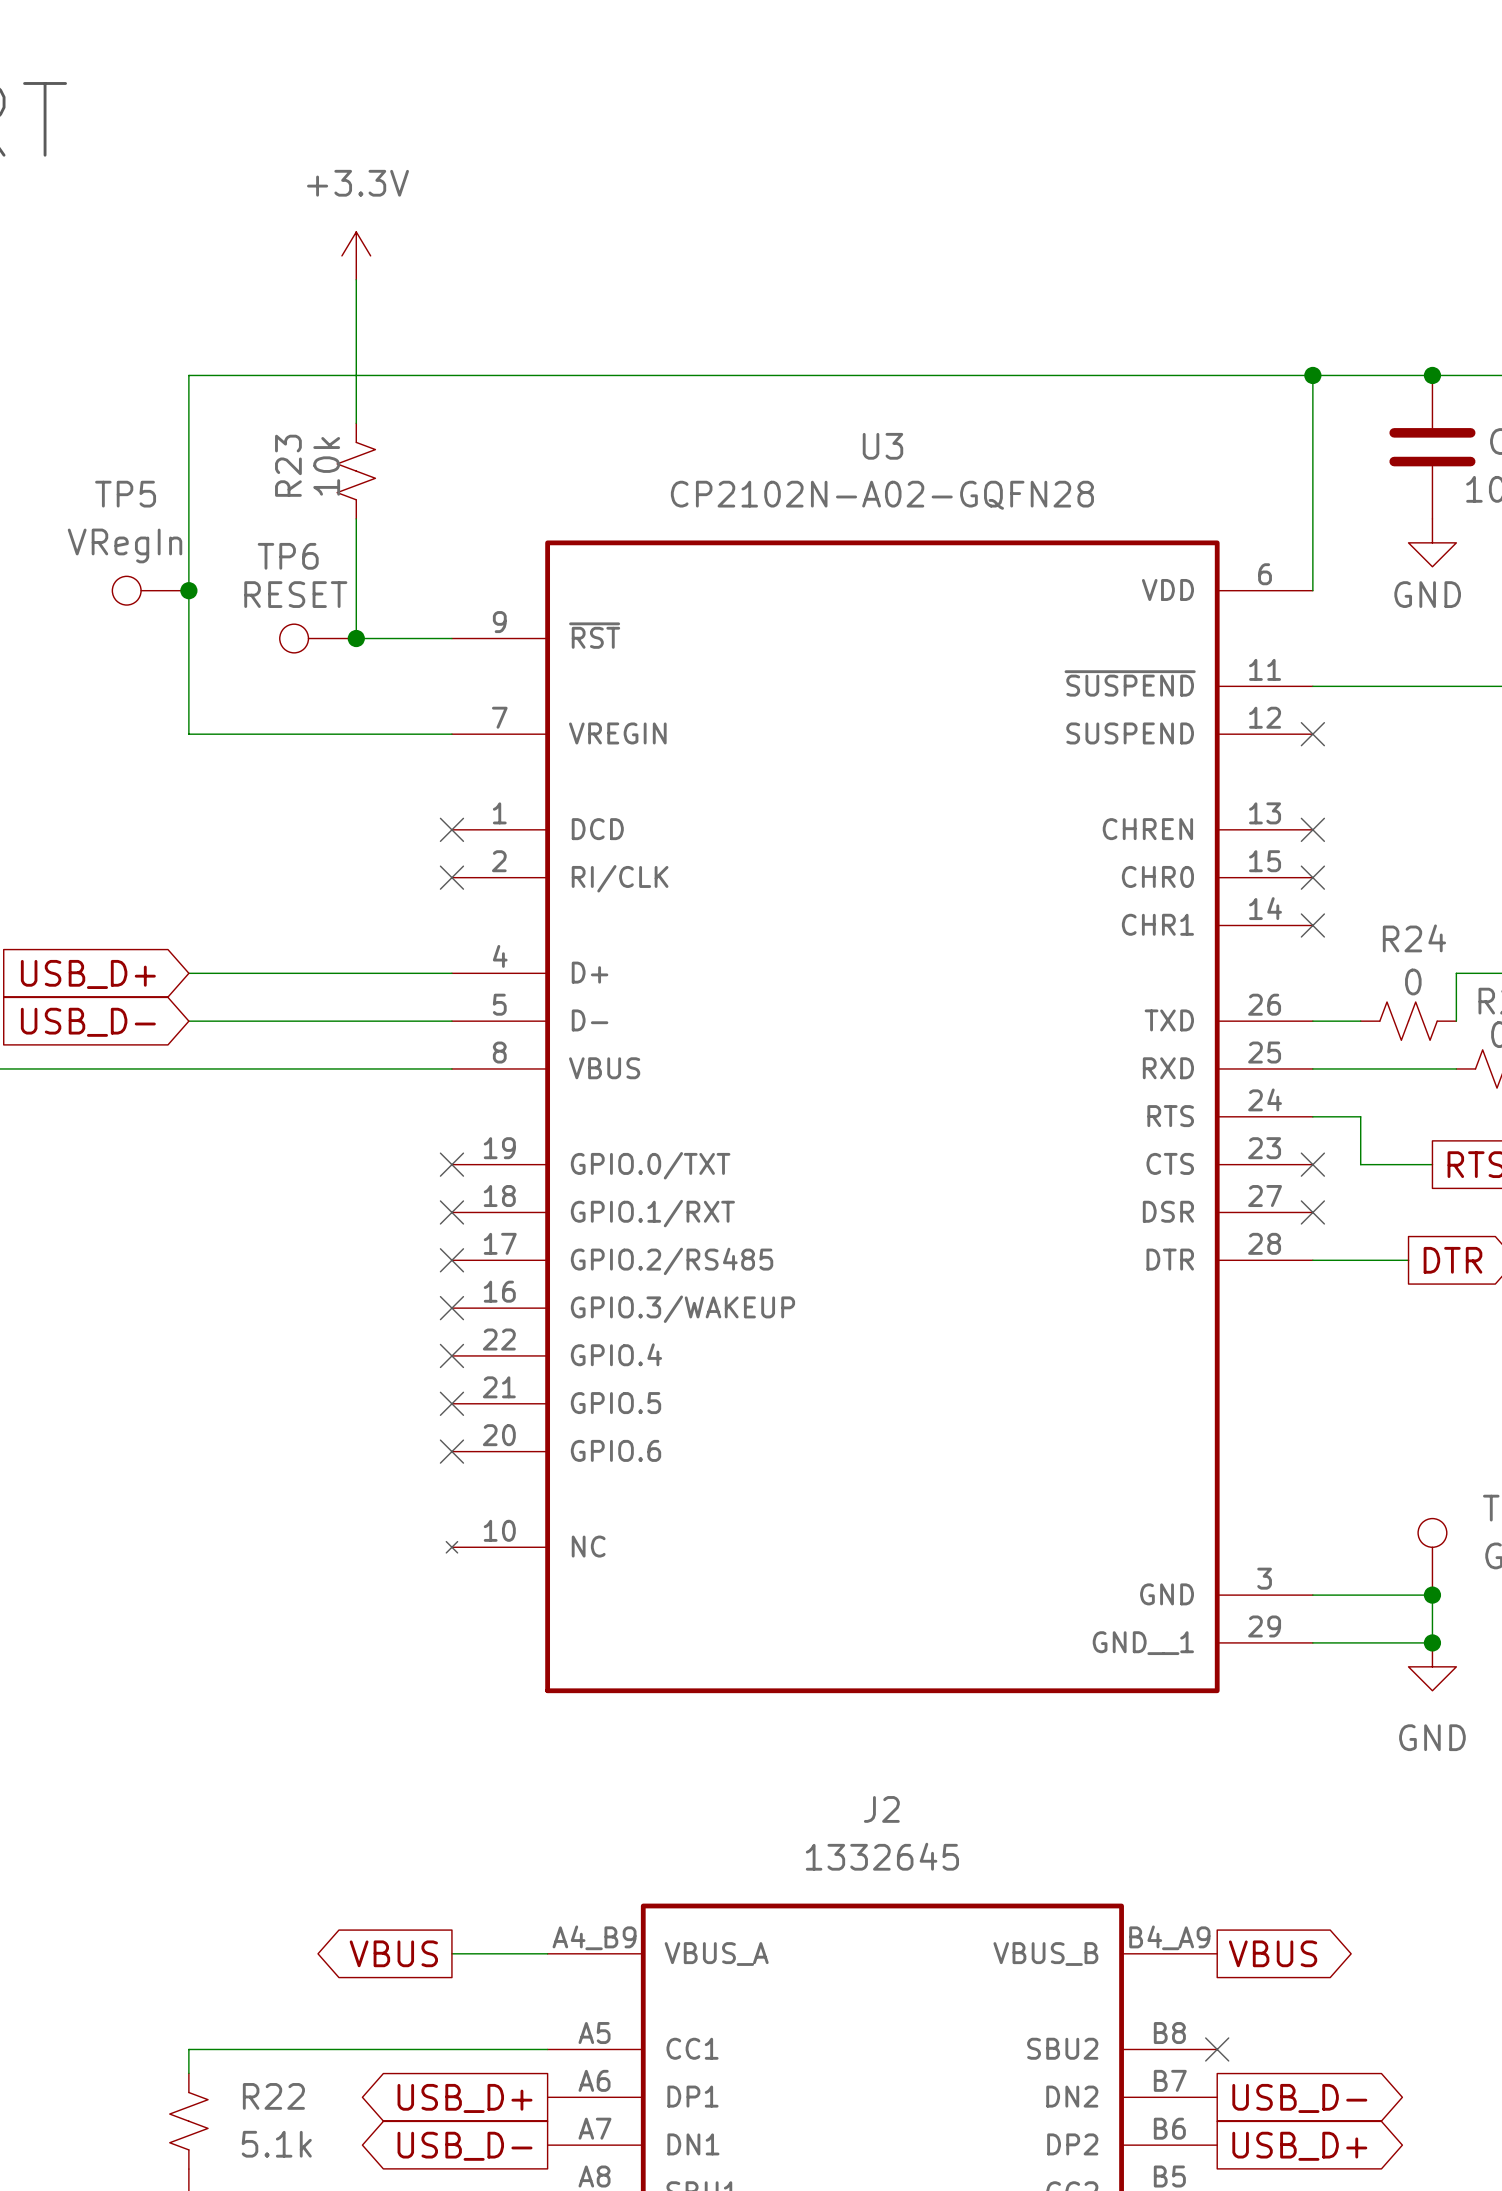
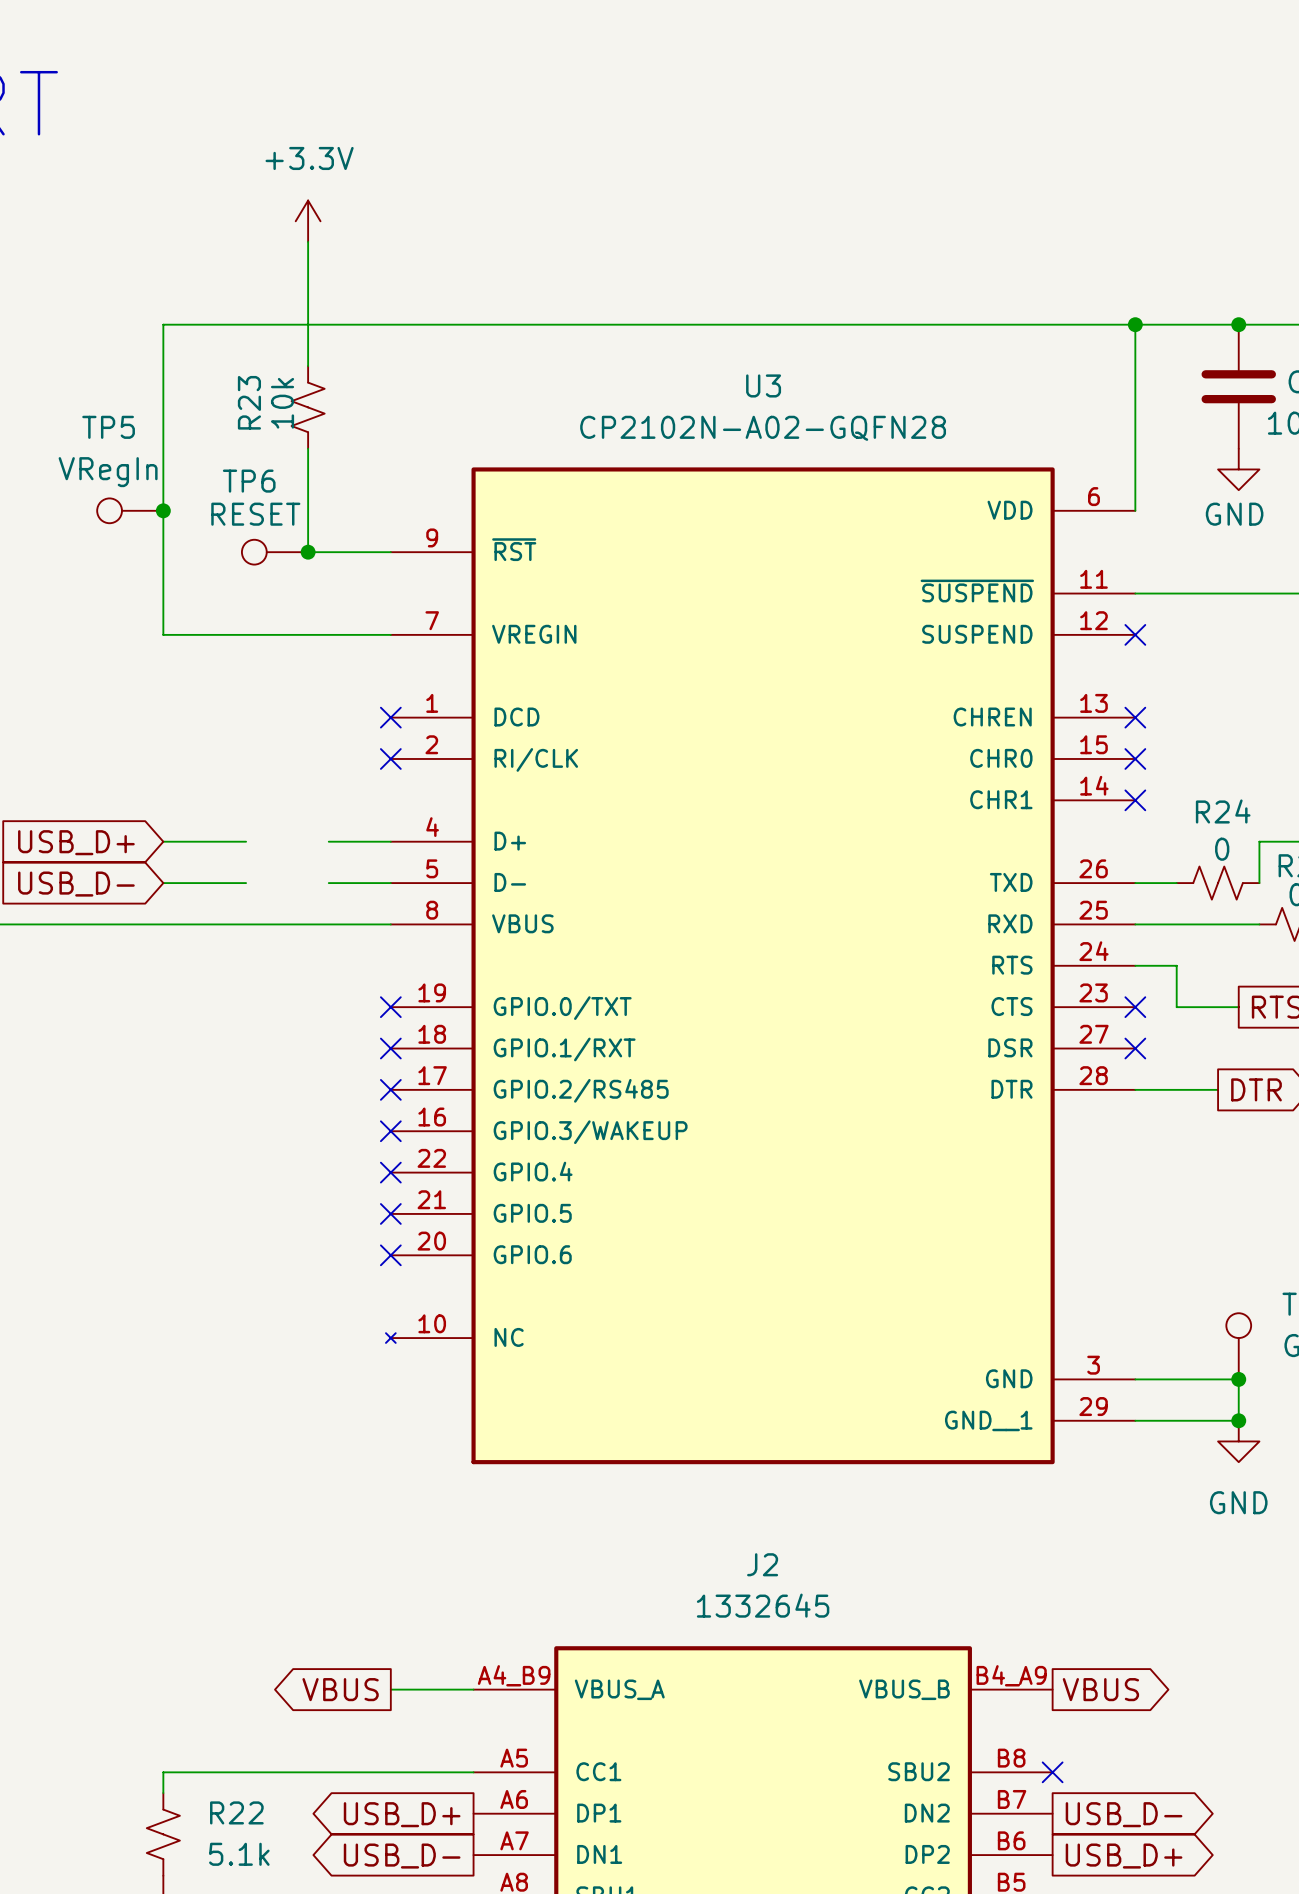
wire: (284, 973) (380, 973) -> none
wire: (284, 1021) (380, 1021) -> none

